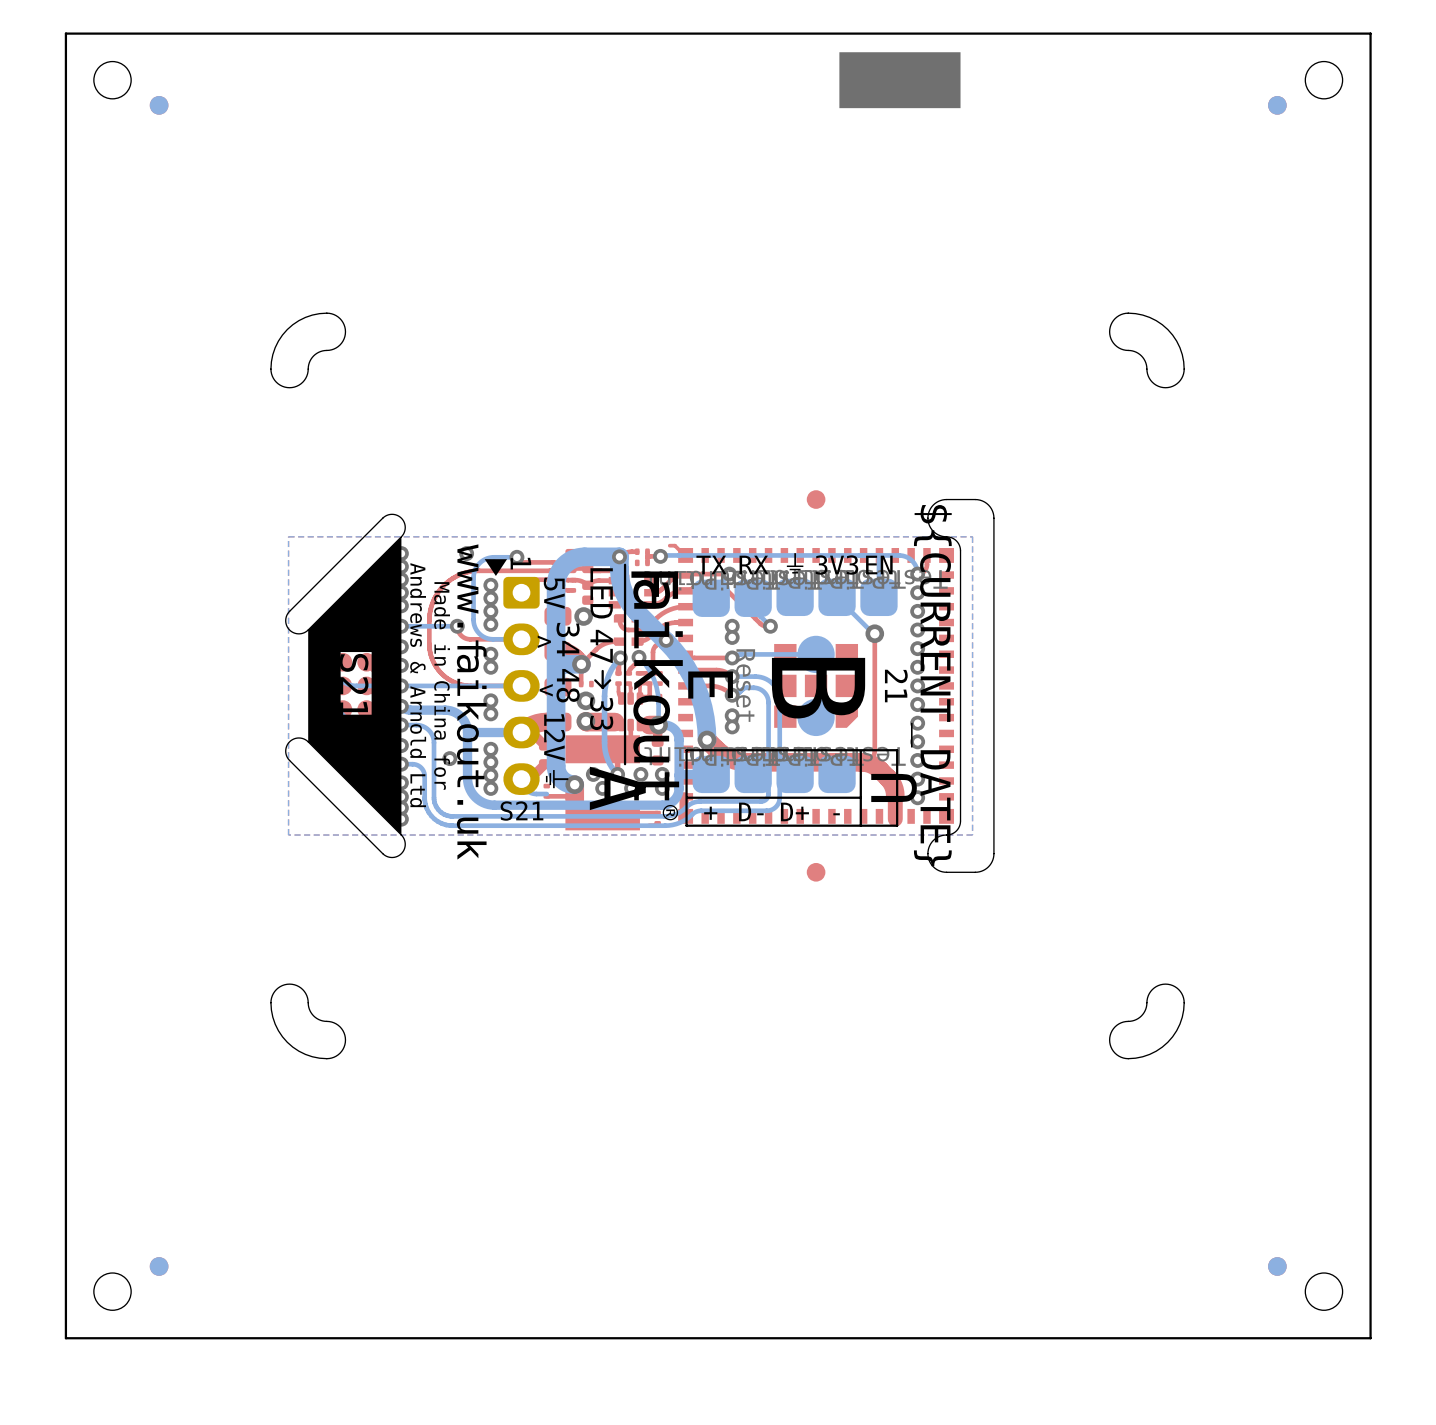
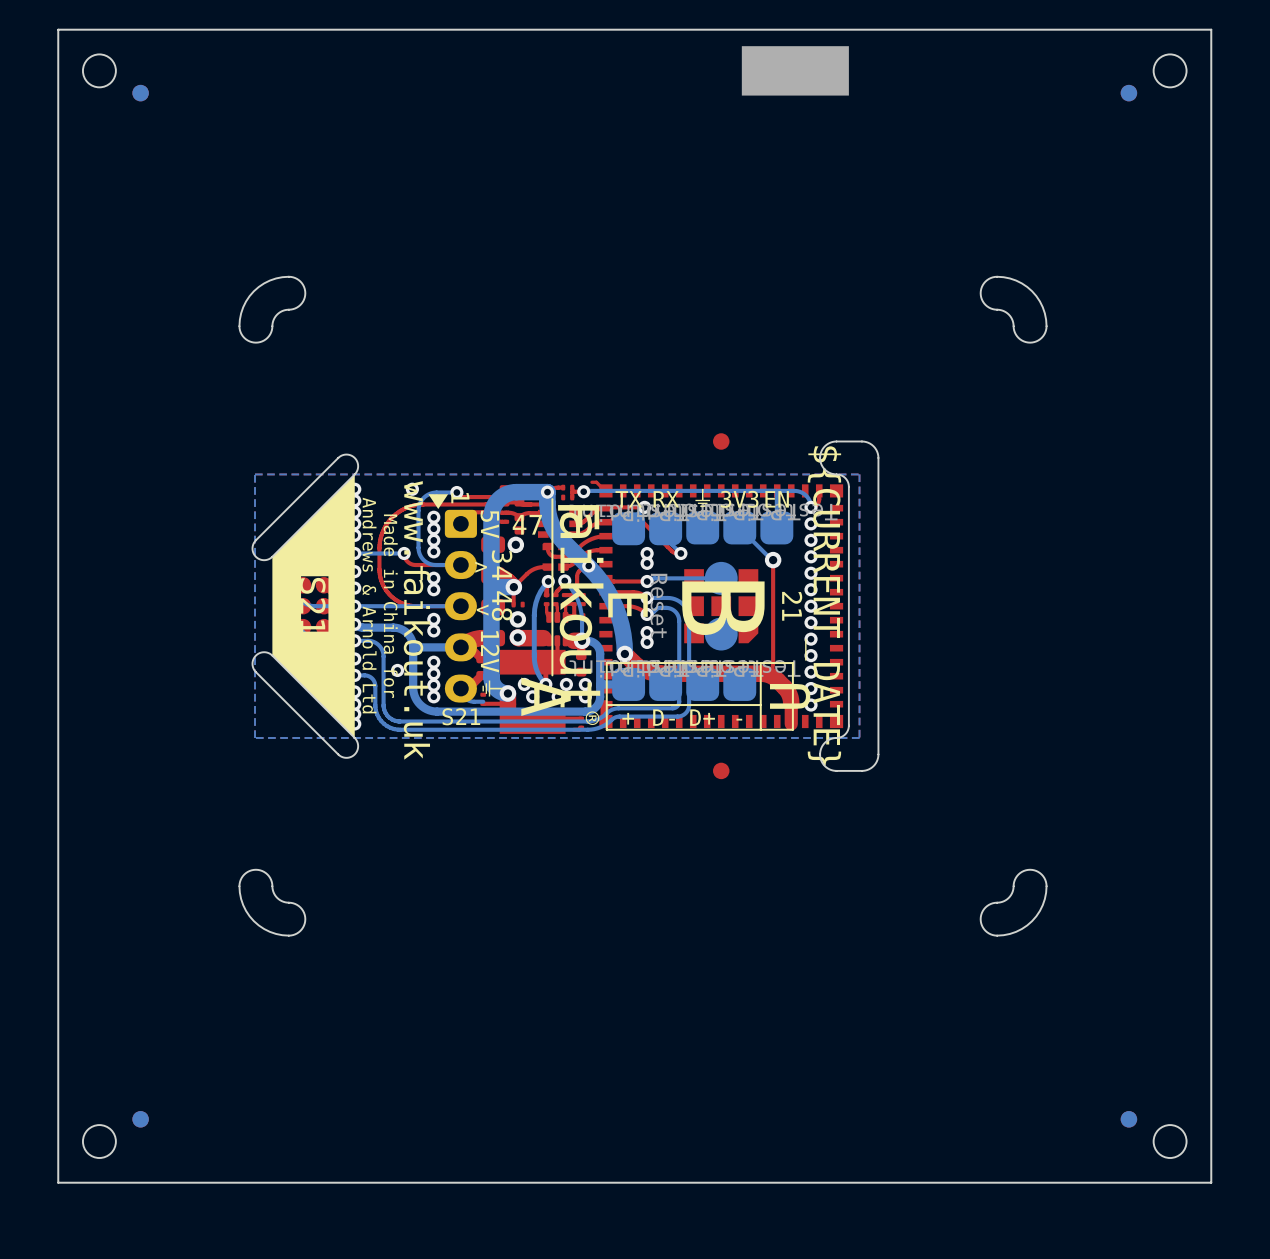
text: LED (601, 593) -> 47 (527, 524)
text: 47 (601, 646) -> none
line: (602, 671) (602, 687) -> none
line: (595, 680) (602, 687) -> none
line: (610, 680) (602, 687) -> none
text: 33 (601, 713) -> none

